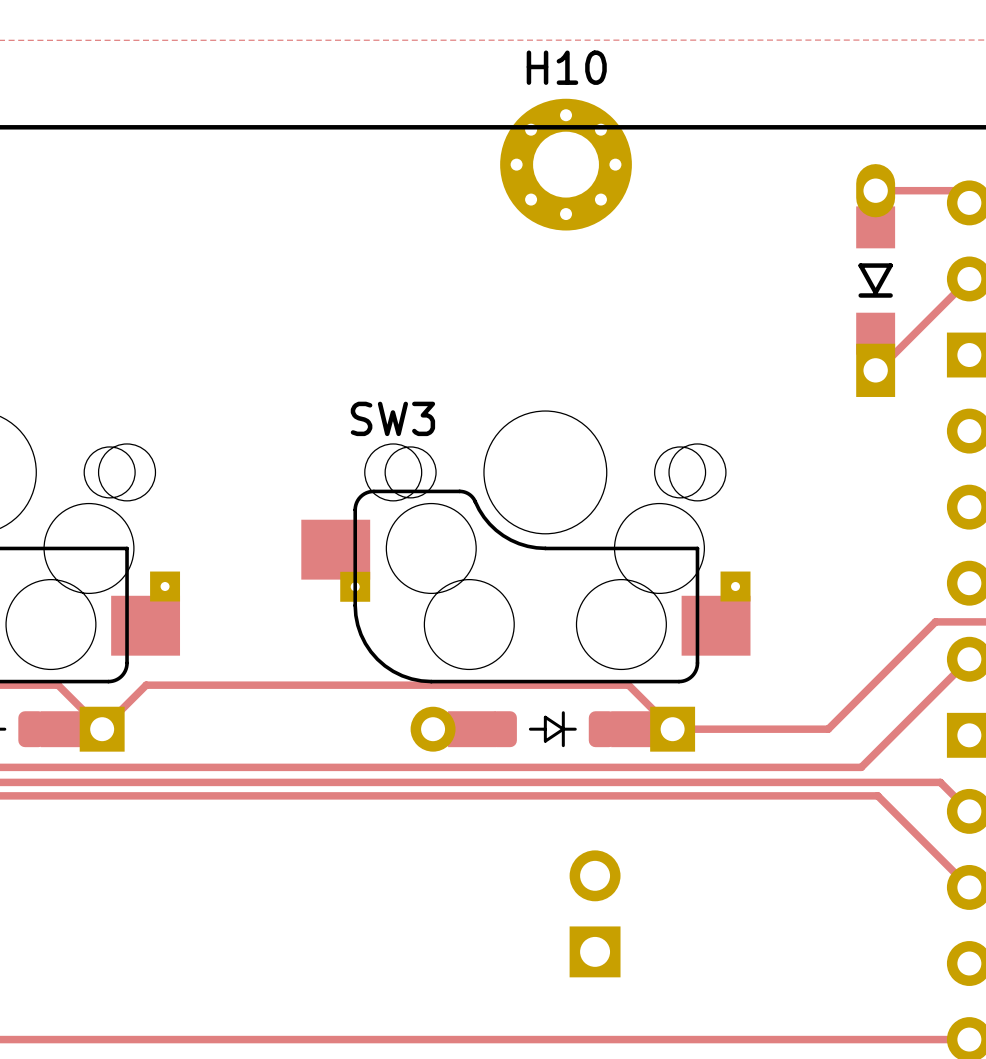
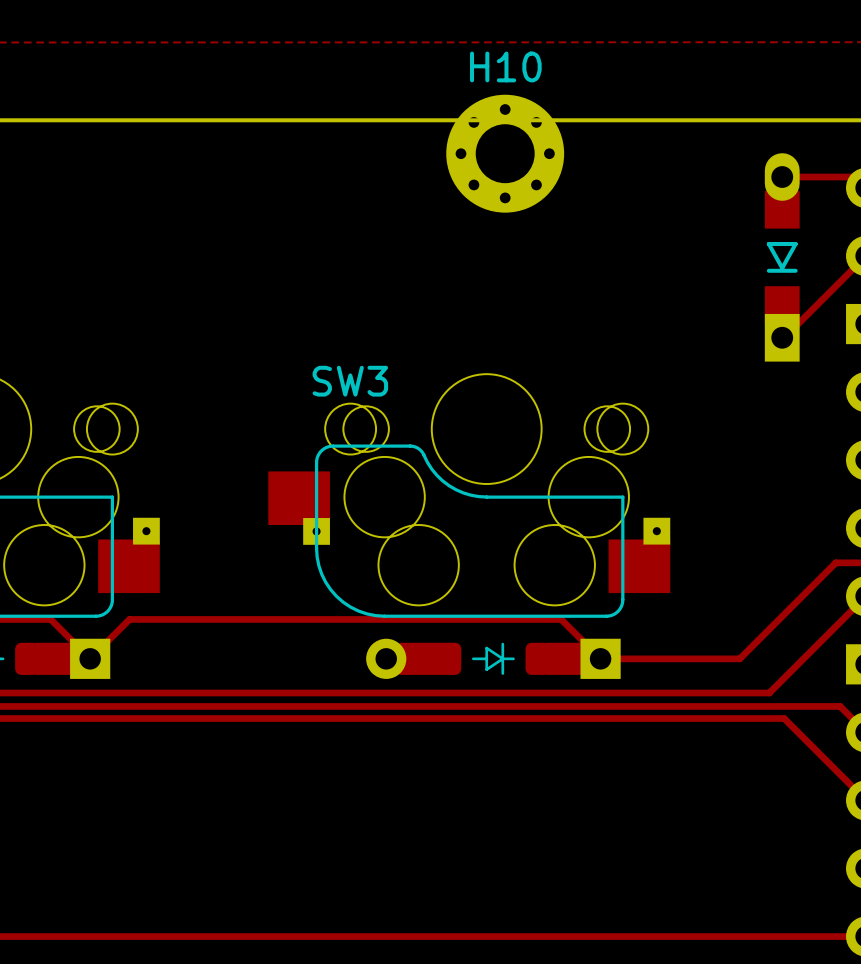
part: (595, 913) -> none

